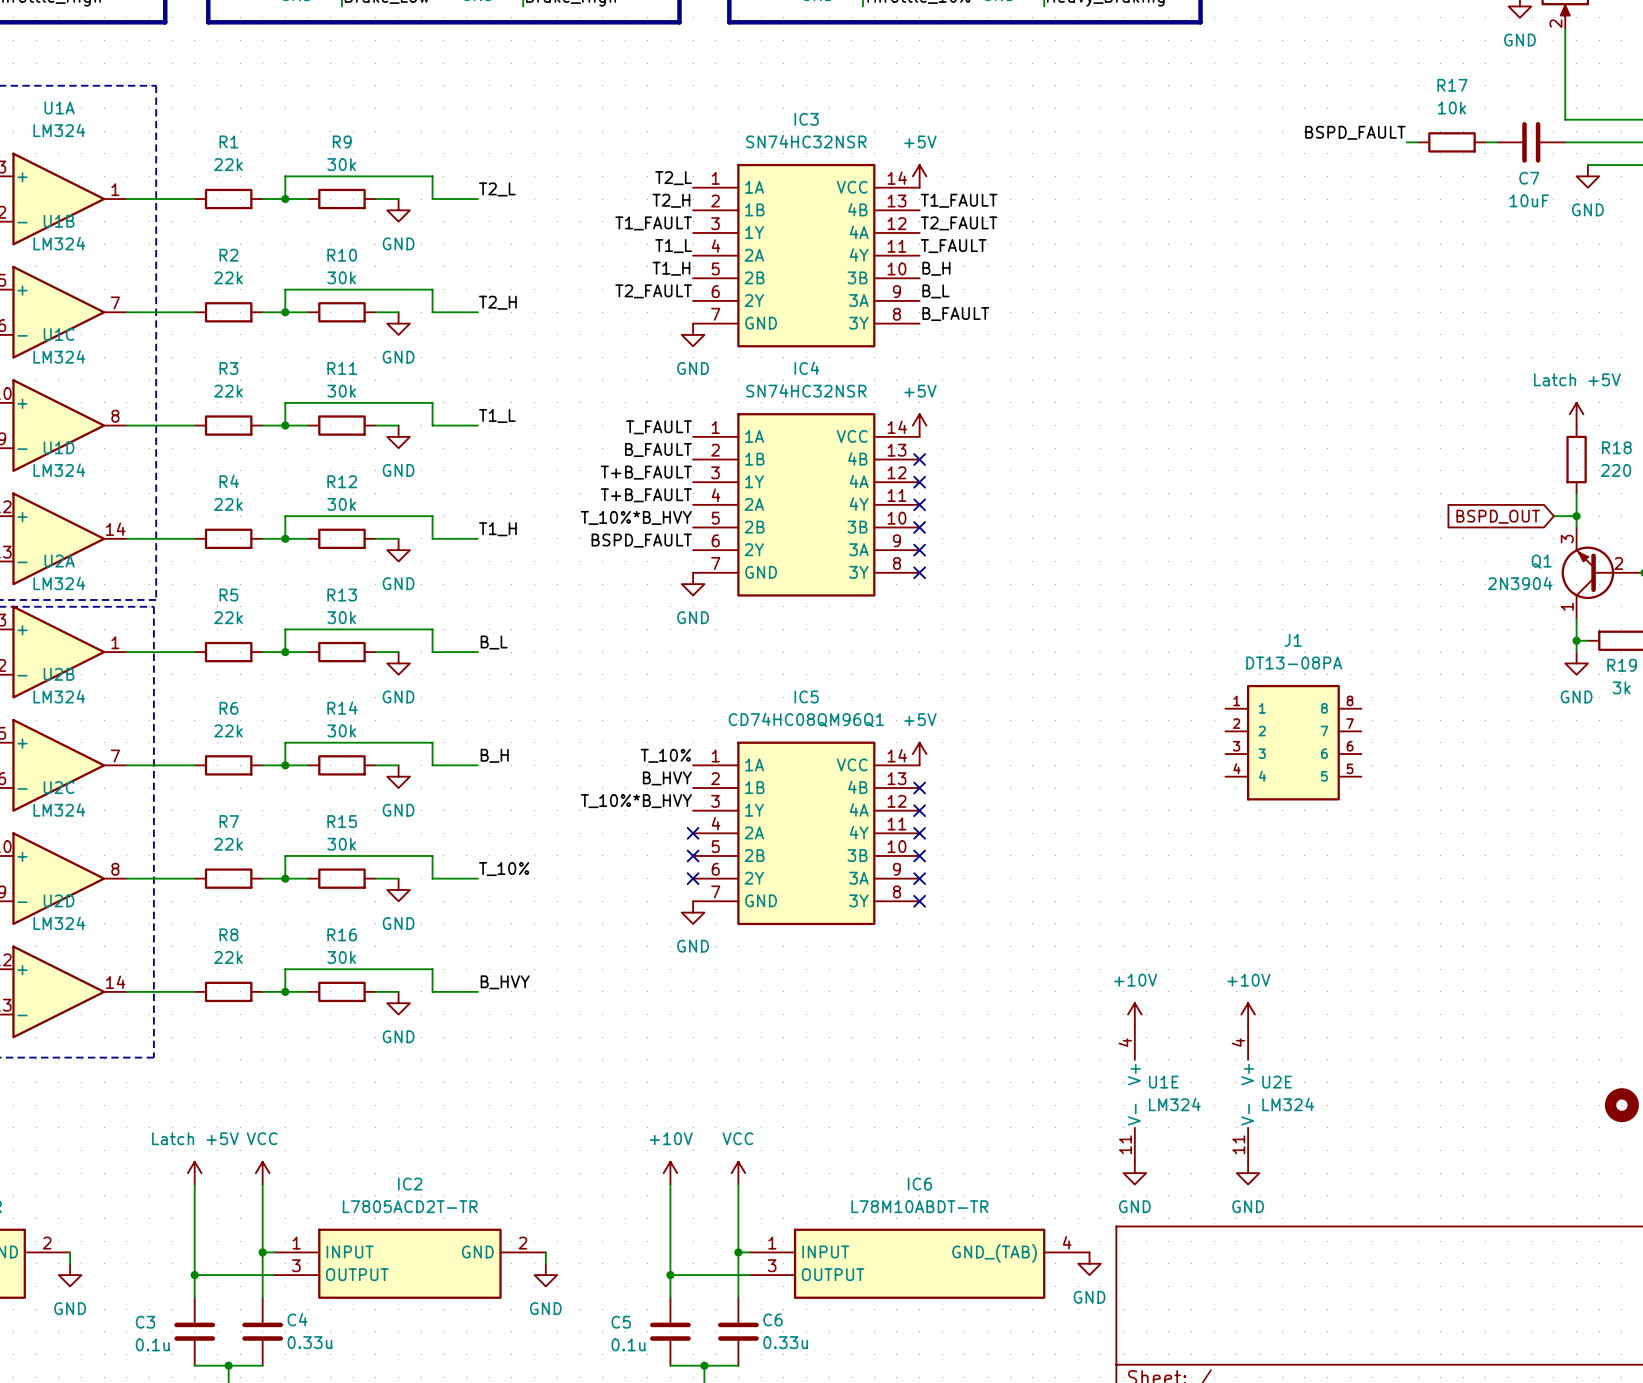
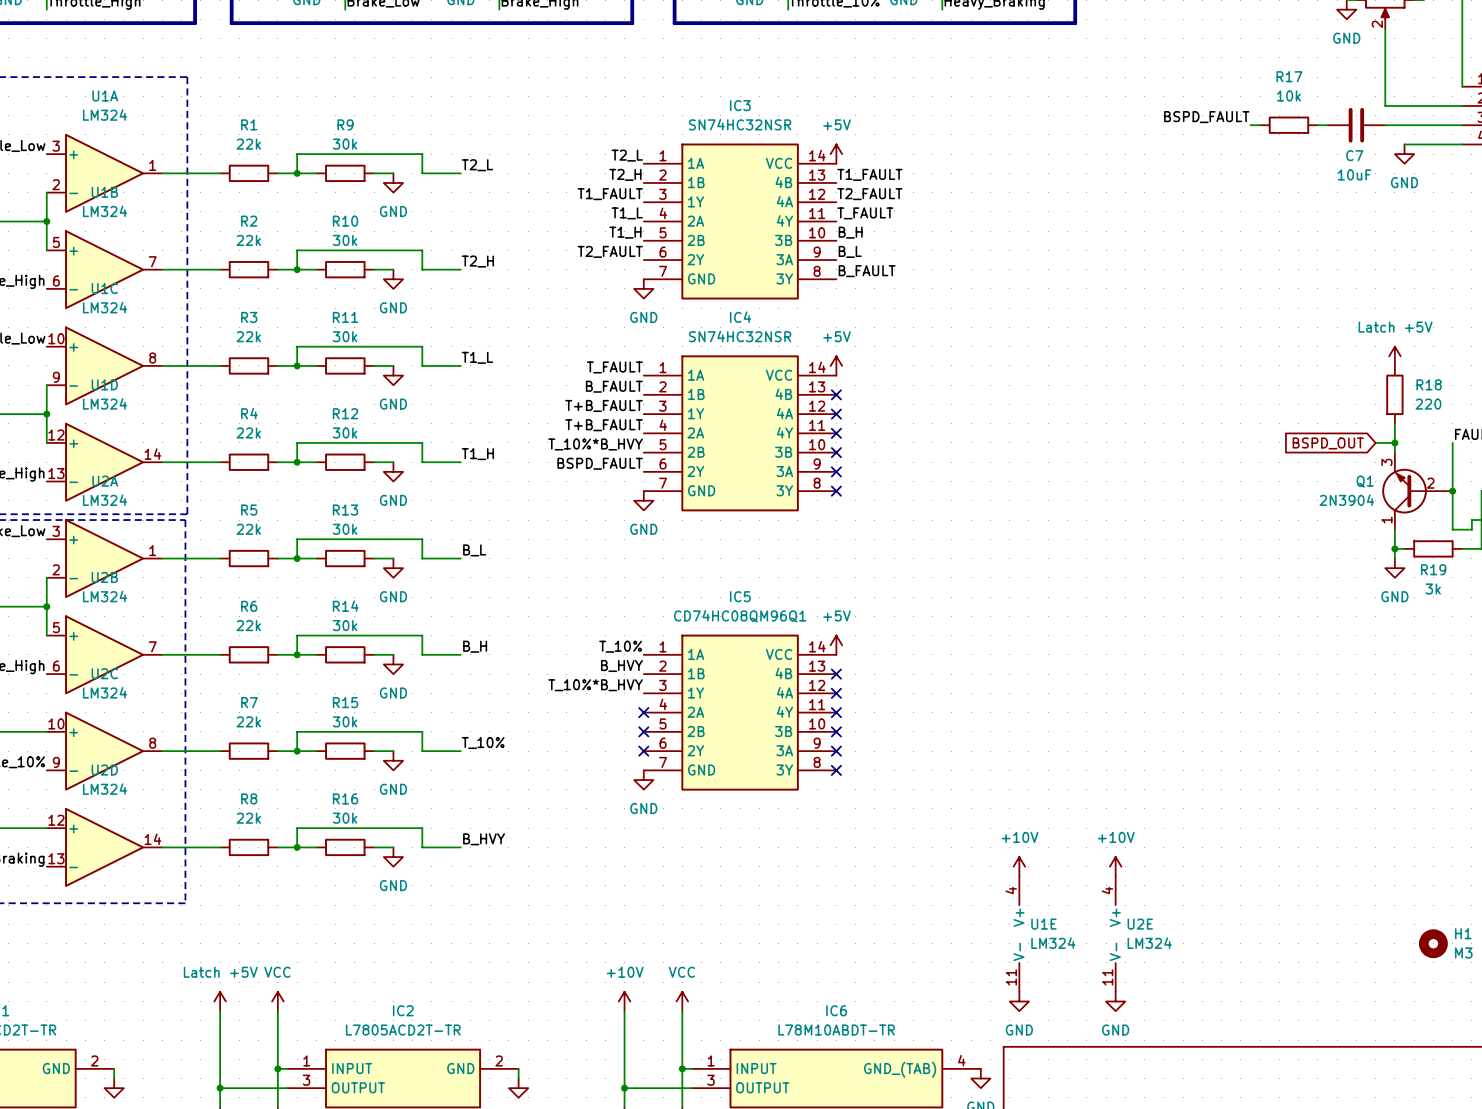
J1: DT13-08PA (1293, 742) -> none

